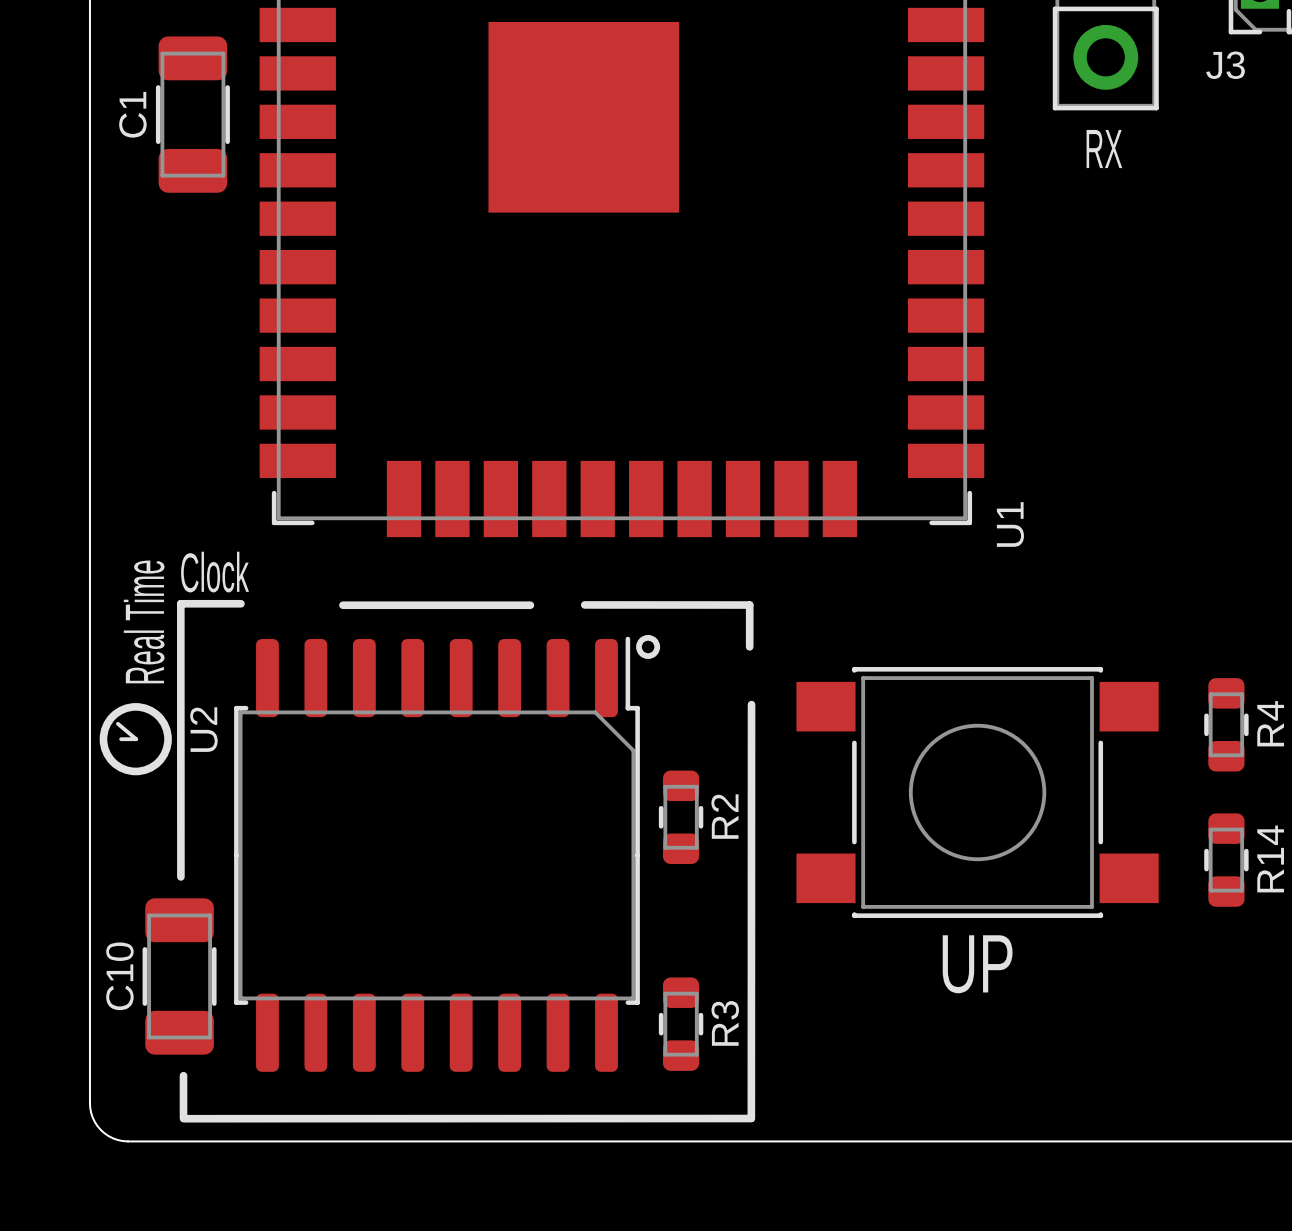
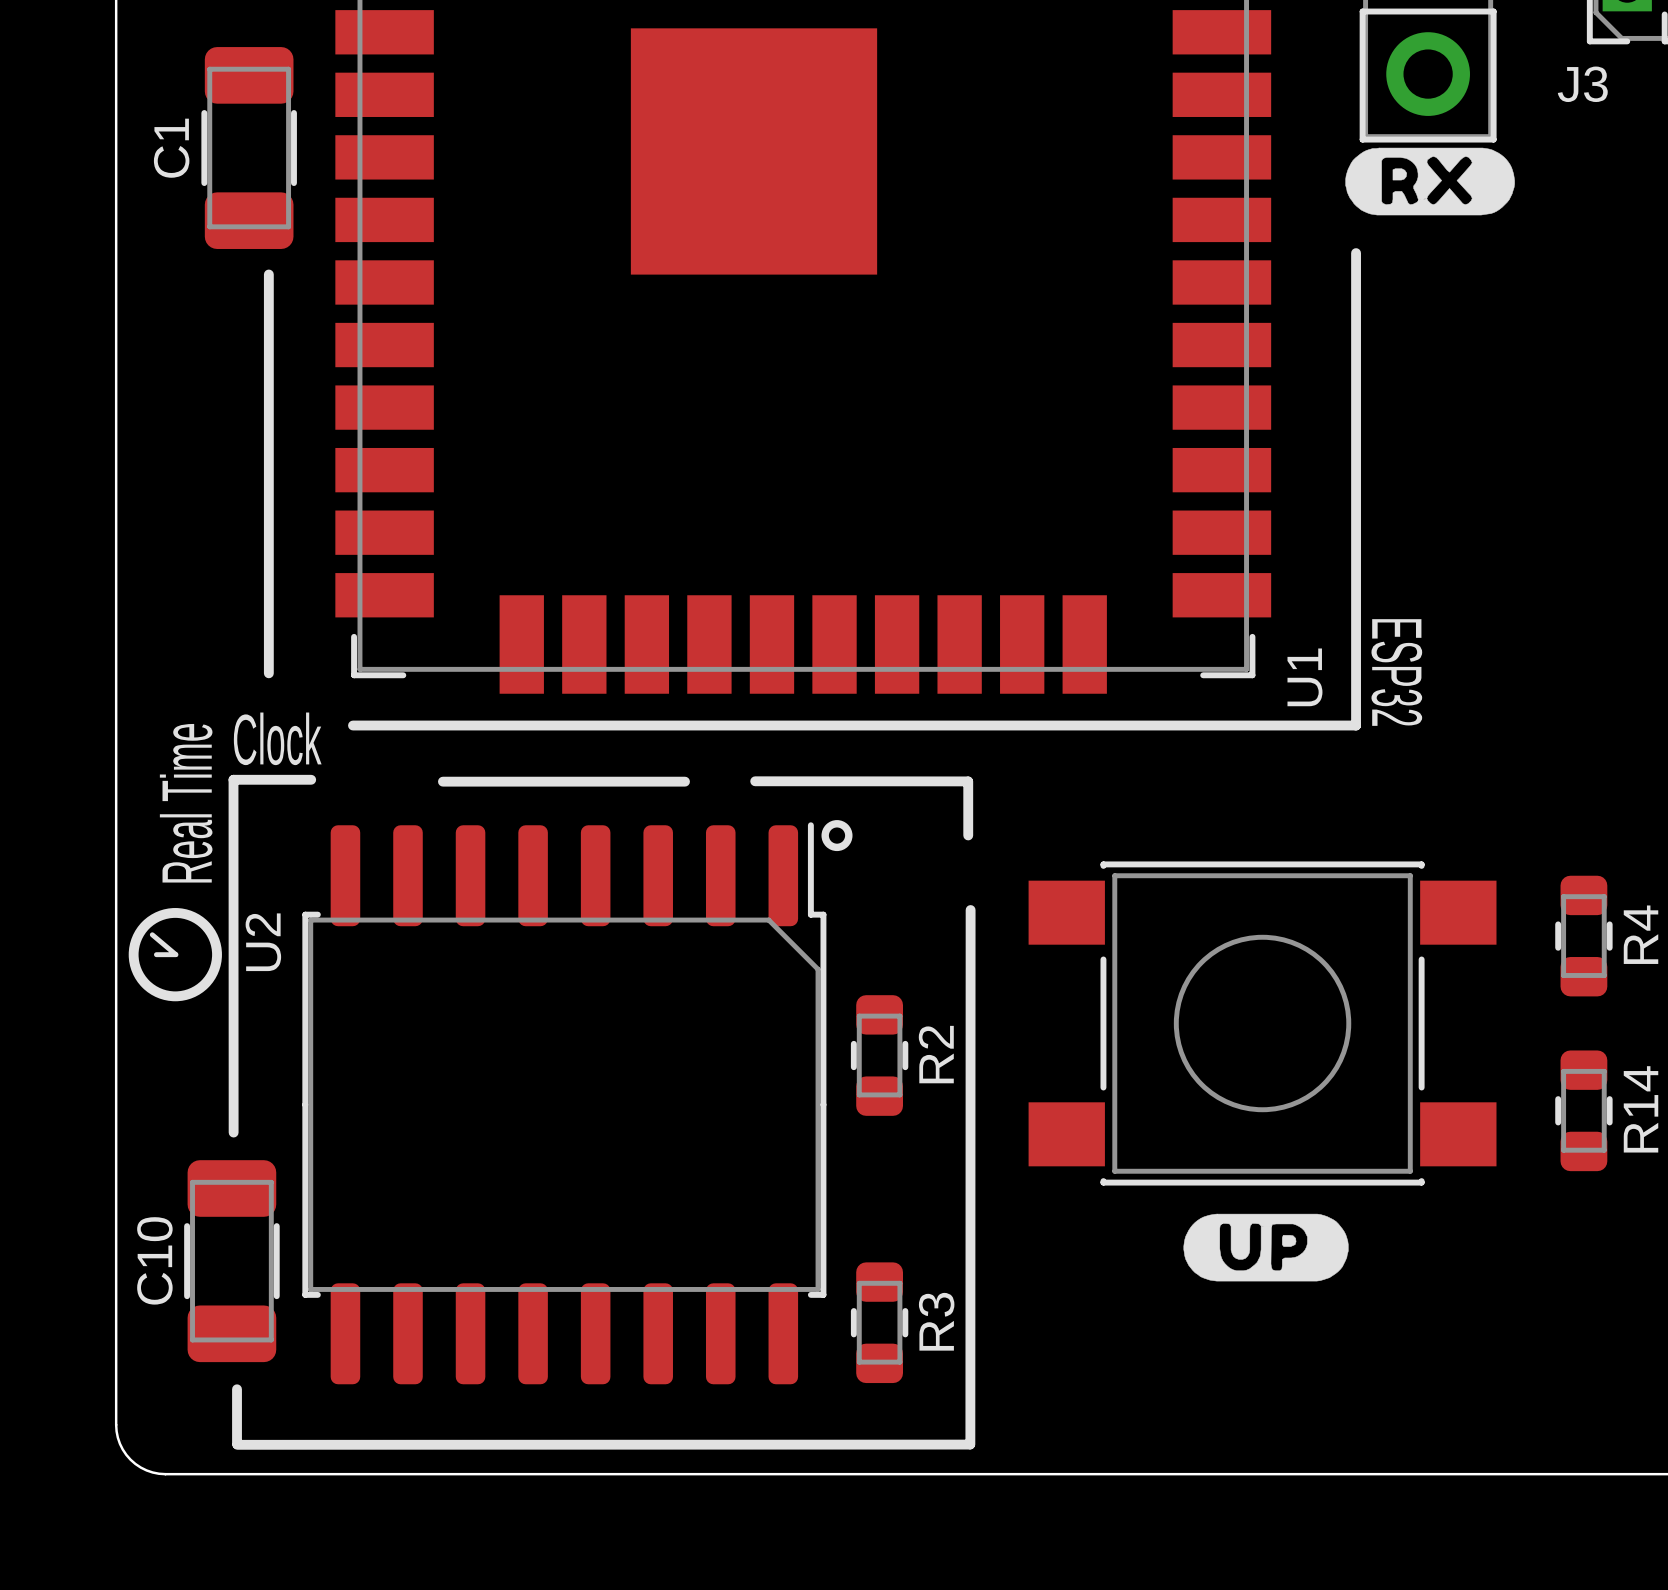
drawing: none -> [1345, 147, 1515, 216]
text: RX (1104, 149) -> none
line: none -> (1356, 253) (1356, 725) (352, 725)
line: none -> (268, 274) (268, 673)
text: none -> ESP32 (1396, 672)
drawing: none -> [1183, 1213, 1349, 1282]
part value: UP (977, 964) -> none

